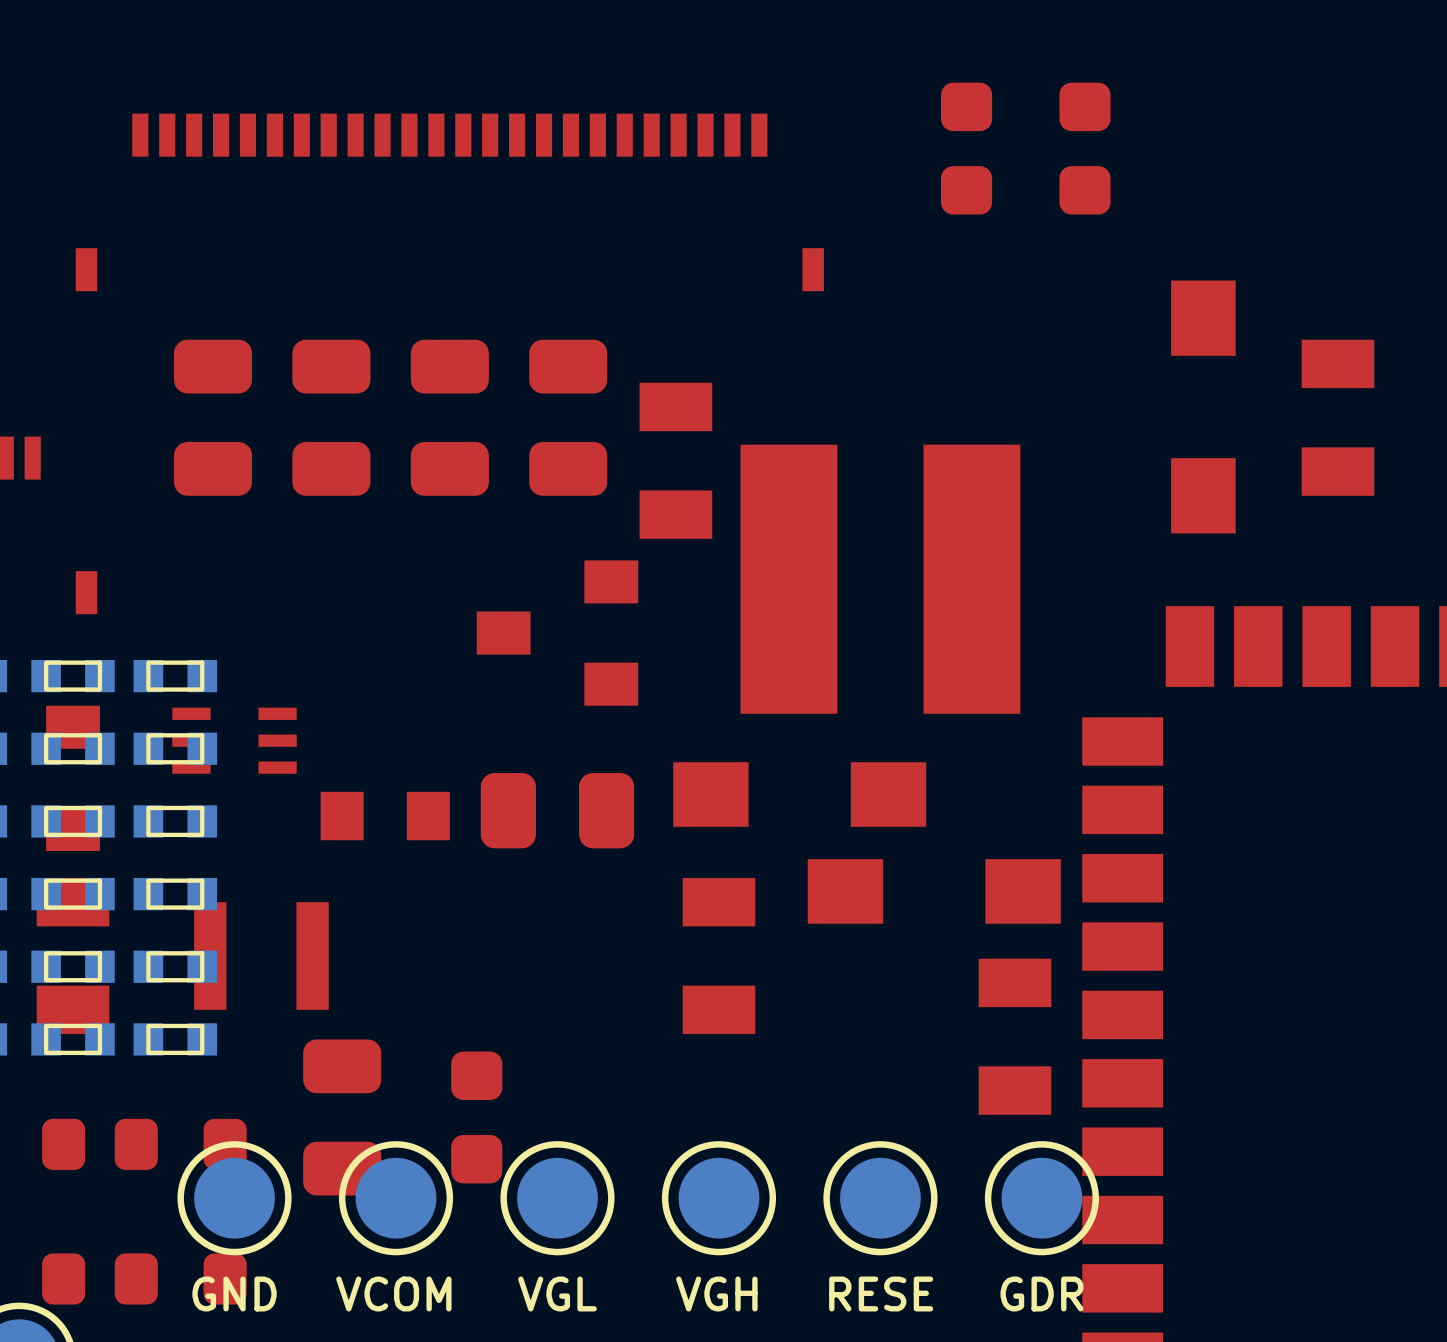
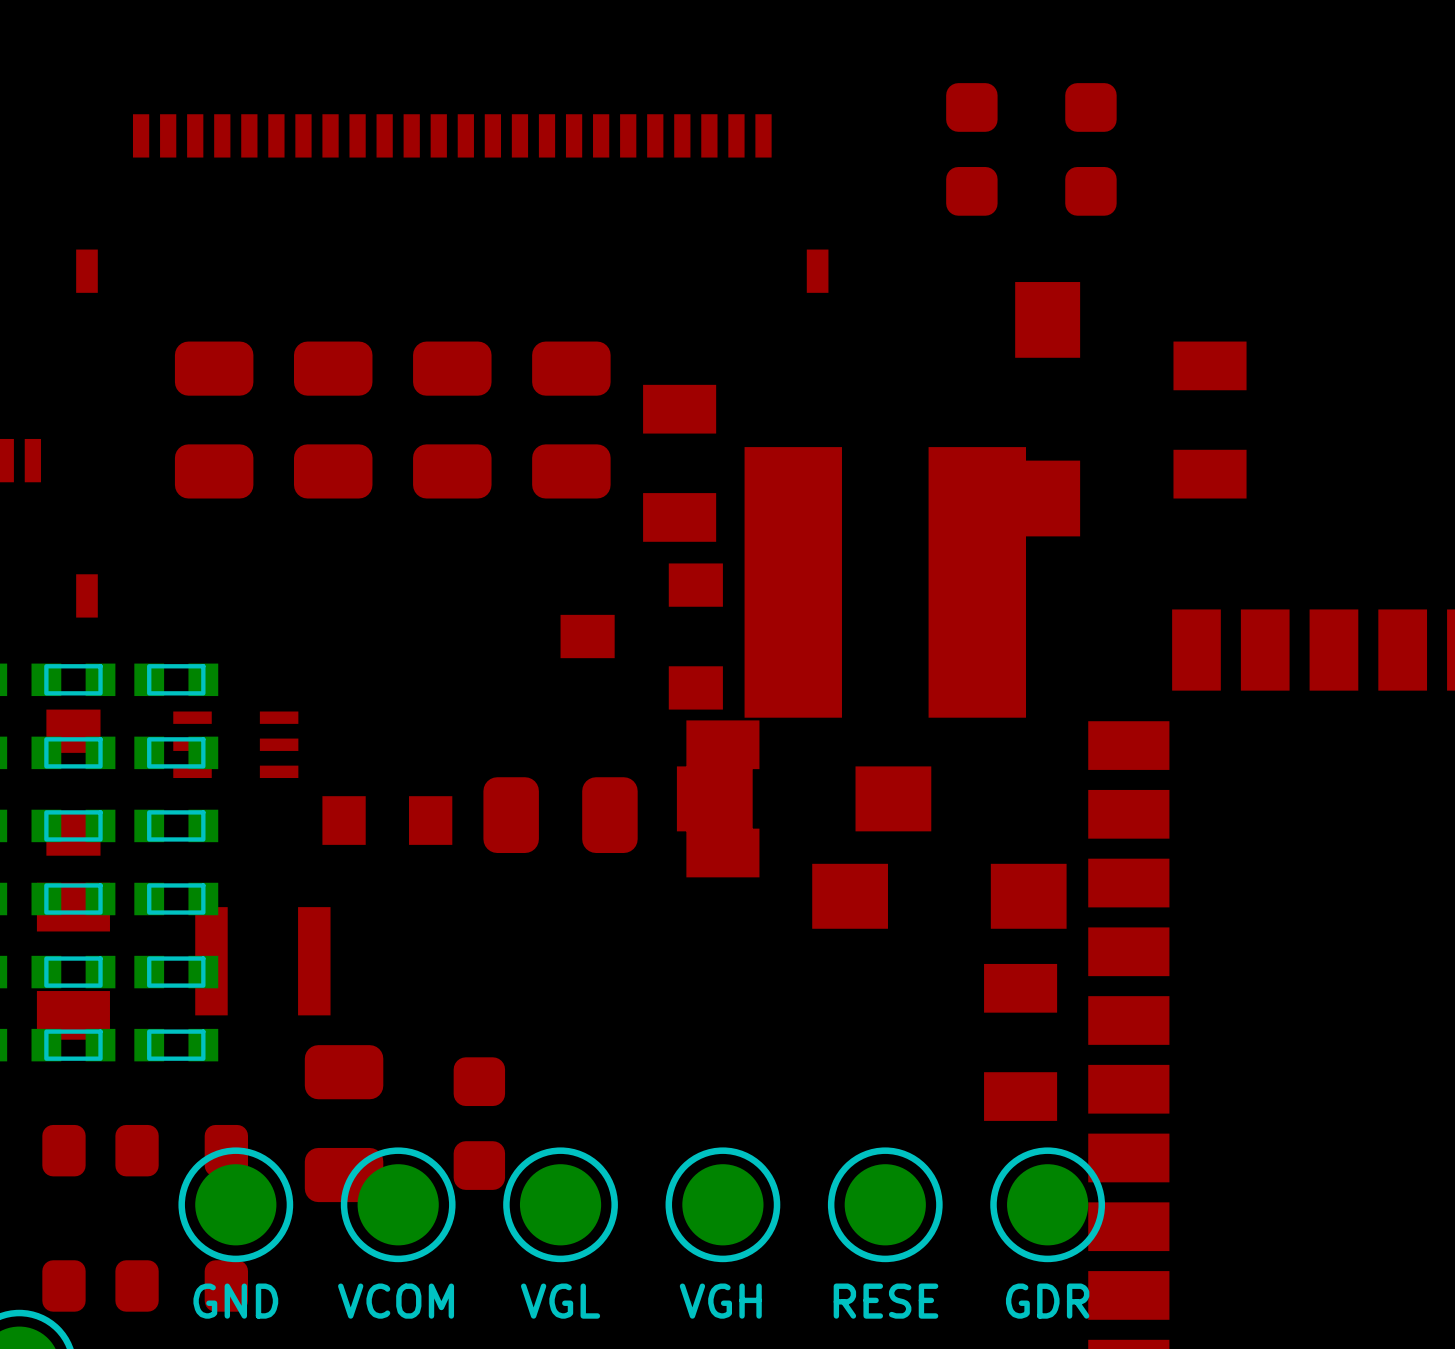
part footprint: [1171, 280, 1236, 534] -> [1173, 341, 1247, 499]
part: none -> (1047, 409)
part: (1337, 417) -> none
part position: (557, 633) -> (641, 636)
part position: (718, 956) -> (722, 798)

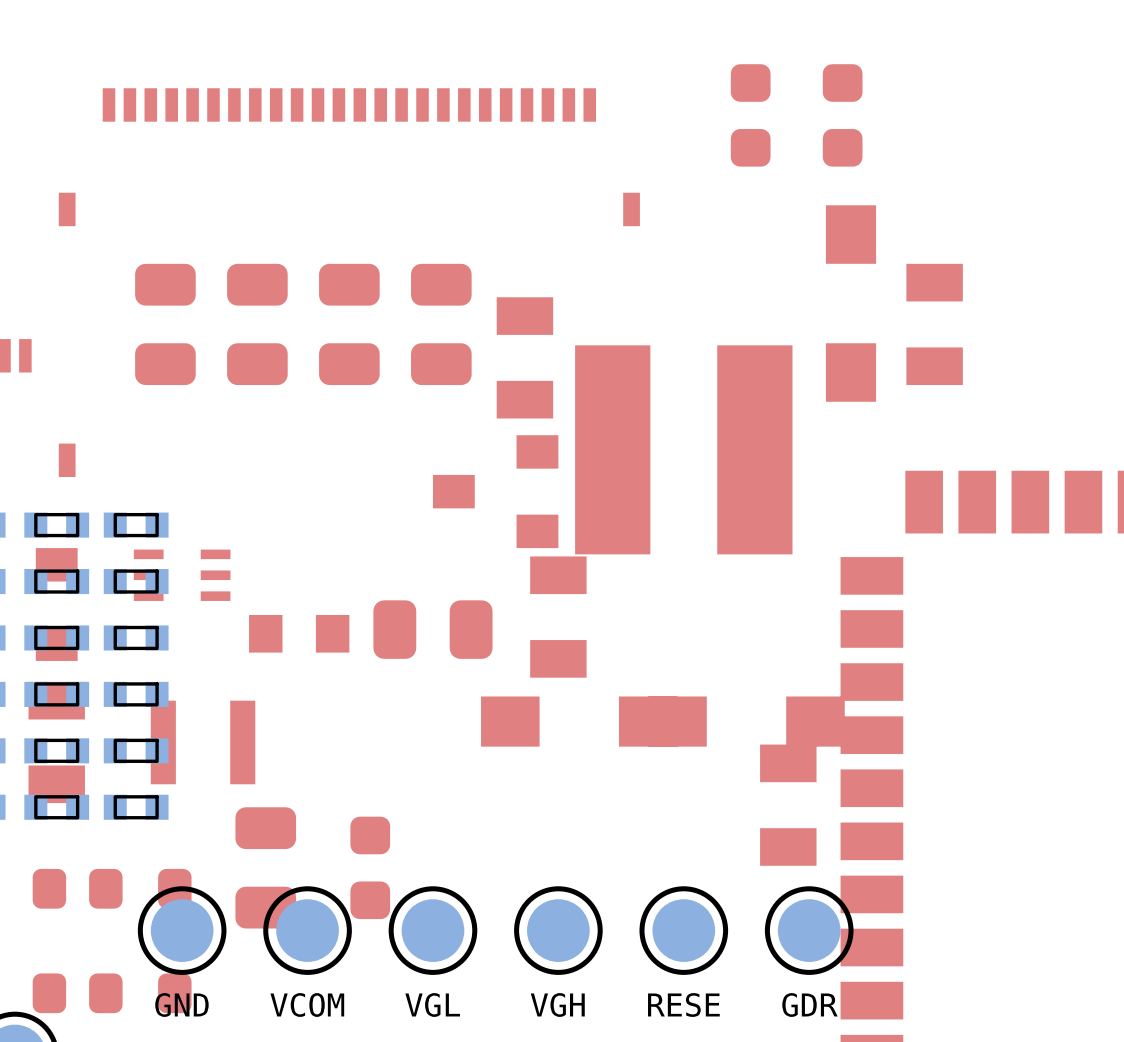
part position: (1047, 409) -> (851, 303)
part position: (804, 798) -> (579, 721)
part position: (939, 896) -> (746, 721)

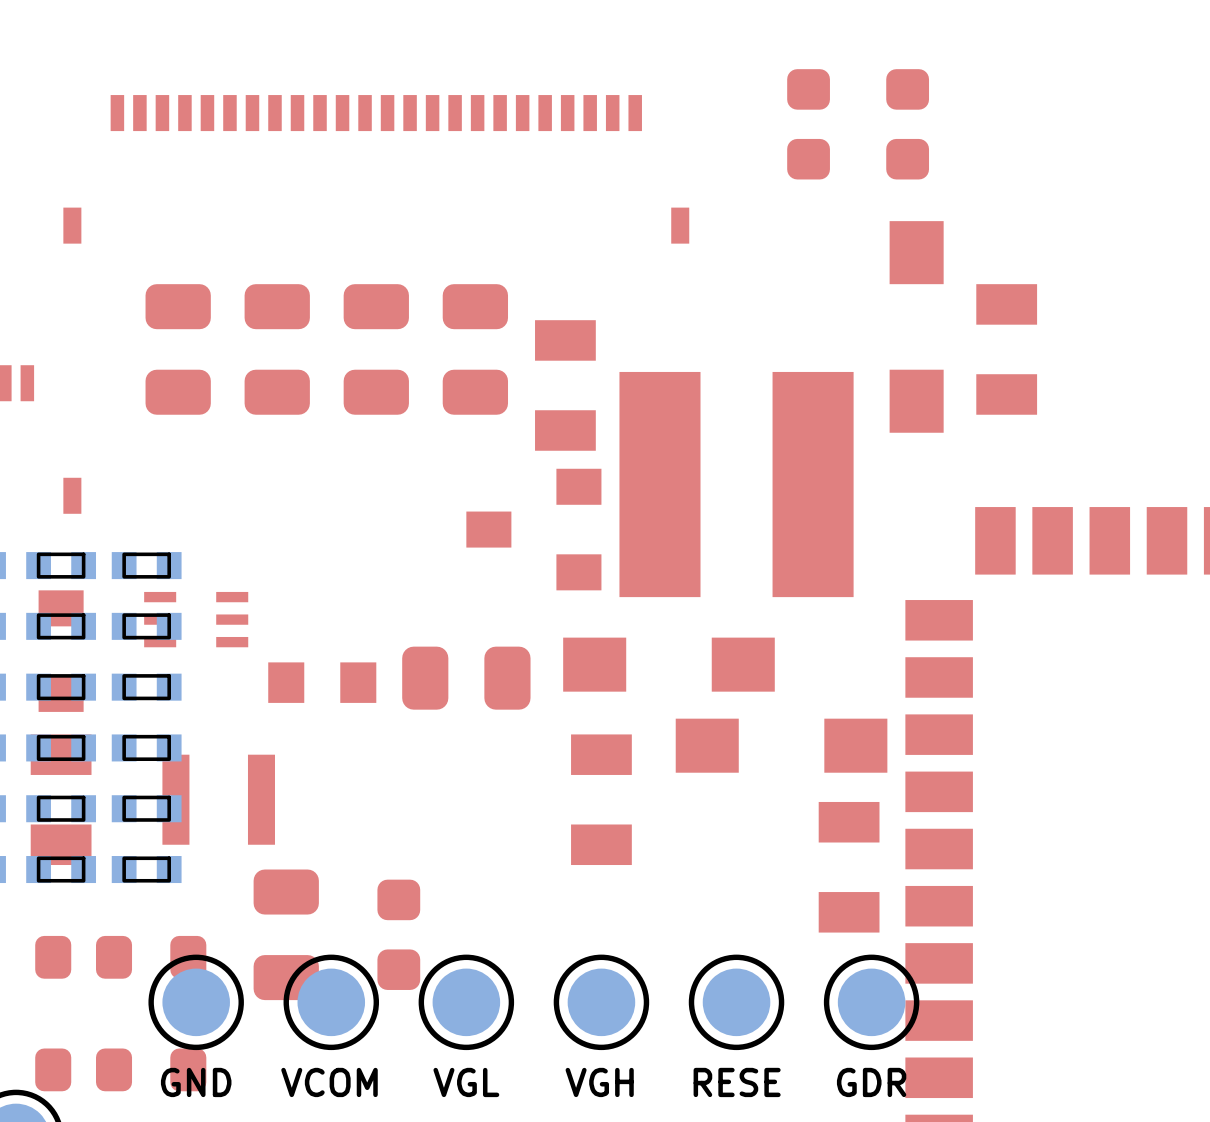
part: (558, 617) -> none
part: none -> (668, 664)
part footprint: [481, 696, 678, 747] -> [571, 734, 632, 866]
part position: (746, 721) -> (781, 745)

